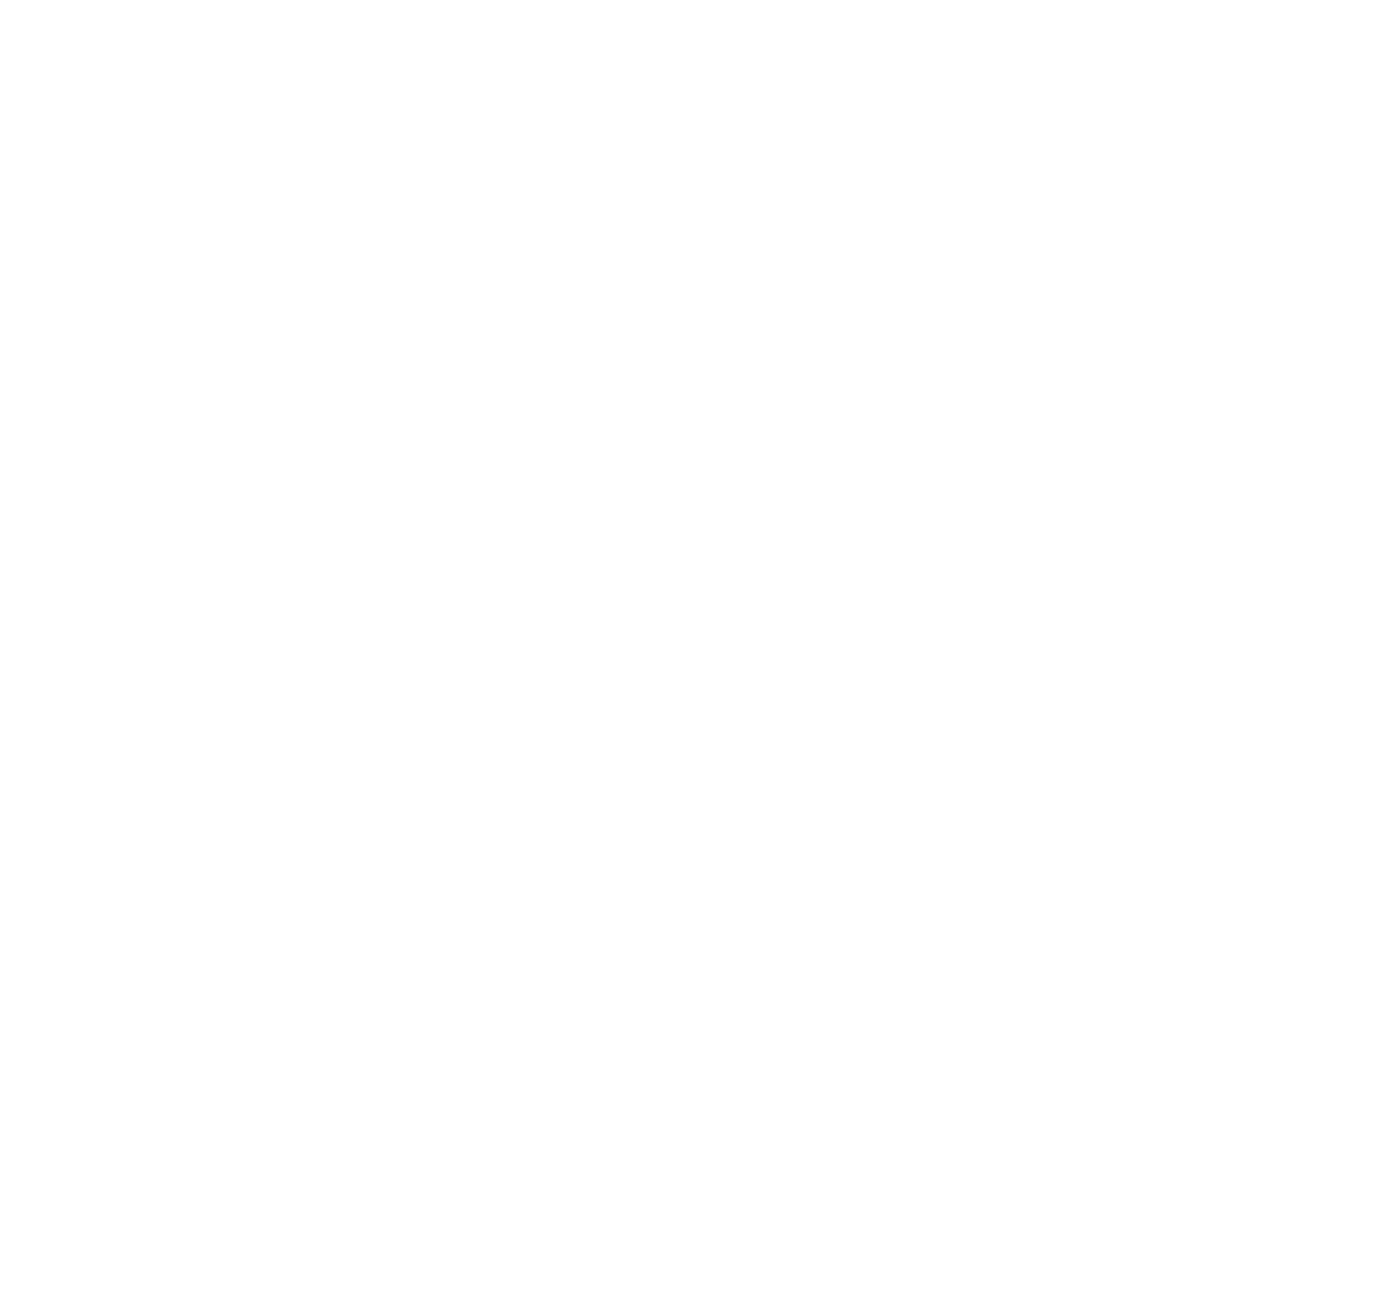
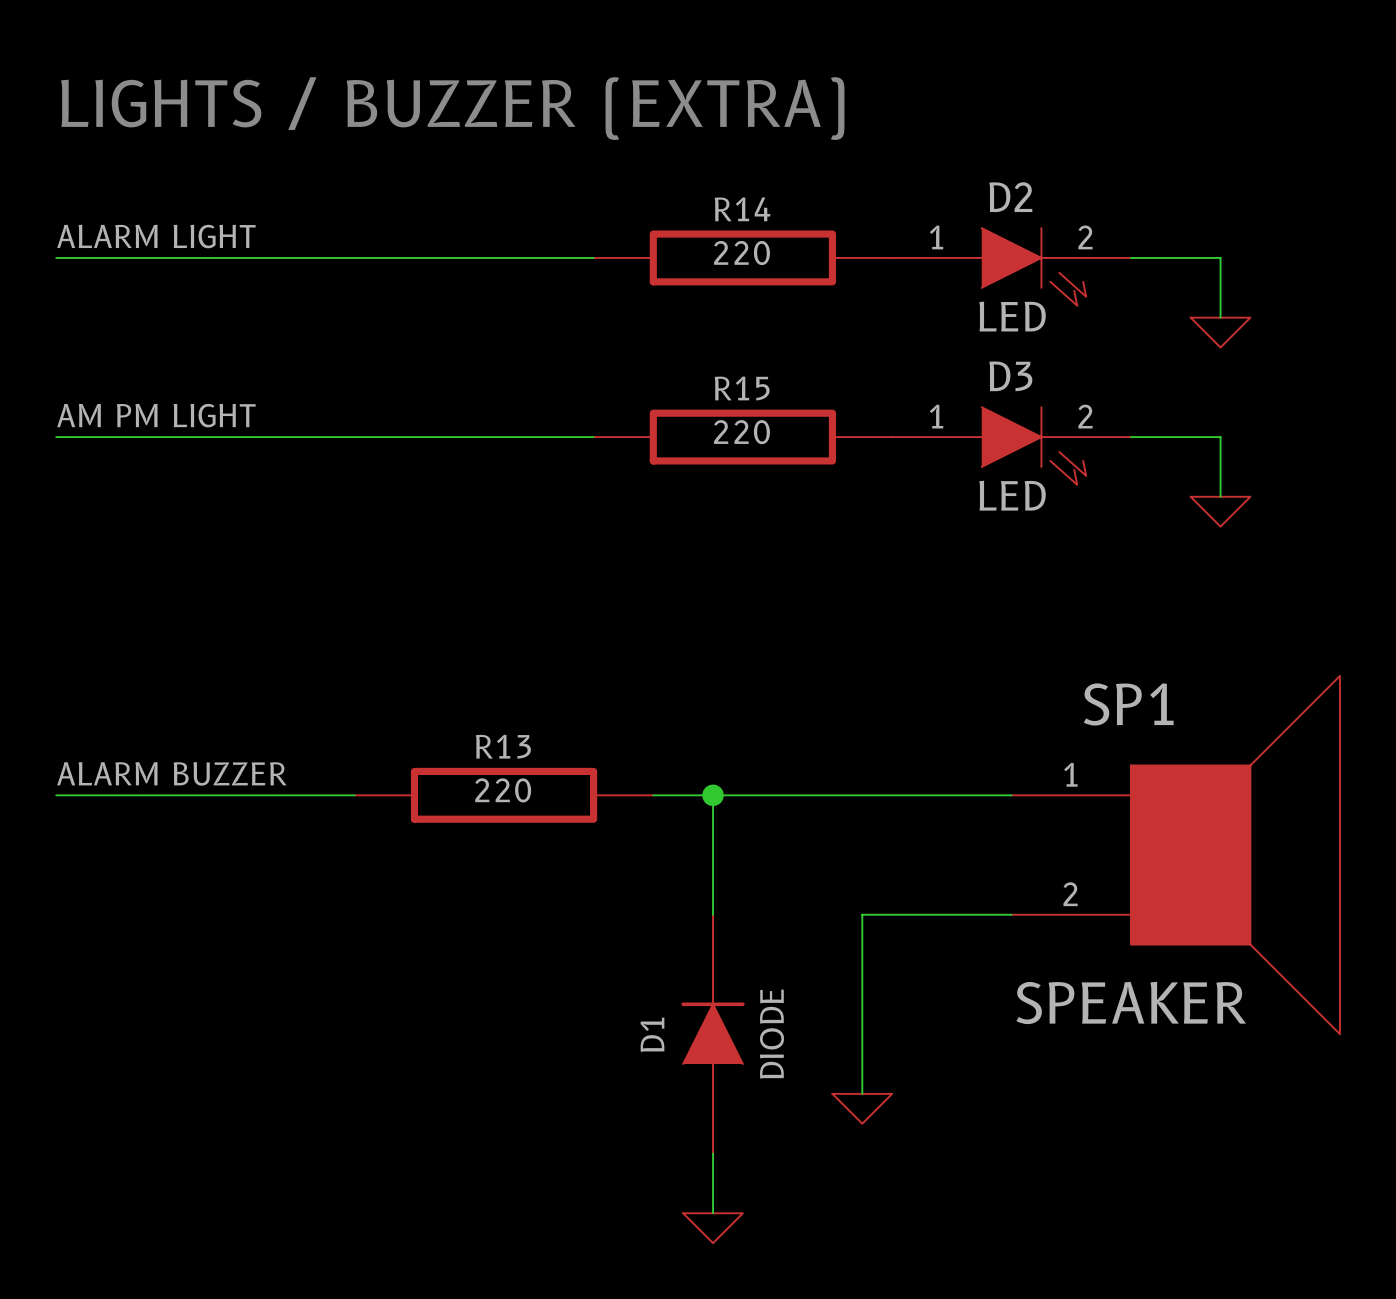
text: none -> LIGHTS / BUZZER (EXTRA) (452, 108)
label: none -> ALARM LIGHT (156, 236)
wire: none -> (56, 257) (593, 257)
R14: none -> 220 (742, 257)
wire: none -> (1130, 257) (1220, 257) (1220, 317)
D2: none -> LED (1011, 266)
power symbol: none -> (1220, 332)
label: none -> AM PM LIGHT (156, 415)
wire: none -> (56, 437) (593, 437)
R15: none -> 220 (742, 437)
wire: none -> (1130, 437) (1220, 437) (1220, 496)
D3: none -> LED (1011, 446)
power symbol: none -> (1220, 511)
label: none -> ALARM BUZZER (171, 773)
wire: none -> (56, 795) (354, 795)
R13: none -> 220 (504, 795)
wire: none -> (653, 795) (1011, 795)
wire: none -> (713, 795) (713, 914)
junction: none -> (713, 795)
SP1: none -> SPEAKER (1175, 855)
wire: none -> (1011, 914) (862, 914) (862, 1093)
D1: none -> DIODE (713, 1034)
power symbol: none -> (862, 1108)
wire: none -> (713, 1153) (713, 1213)
power symbol: none -> (713, 1228)

